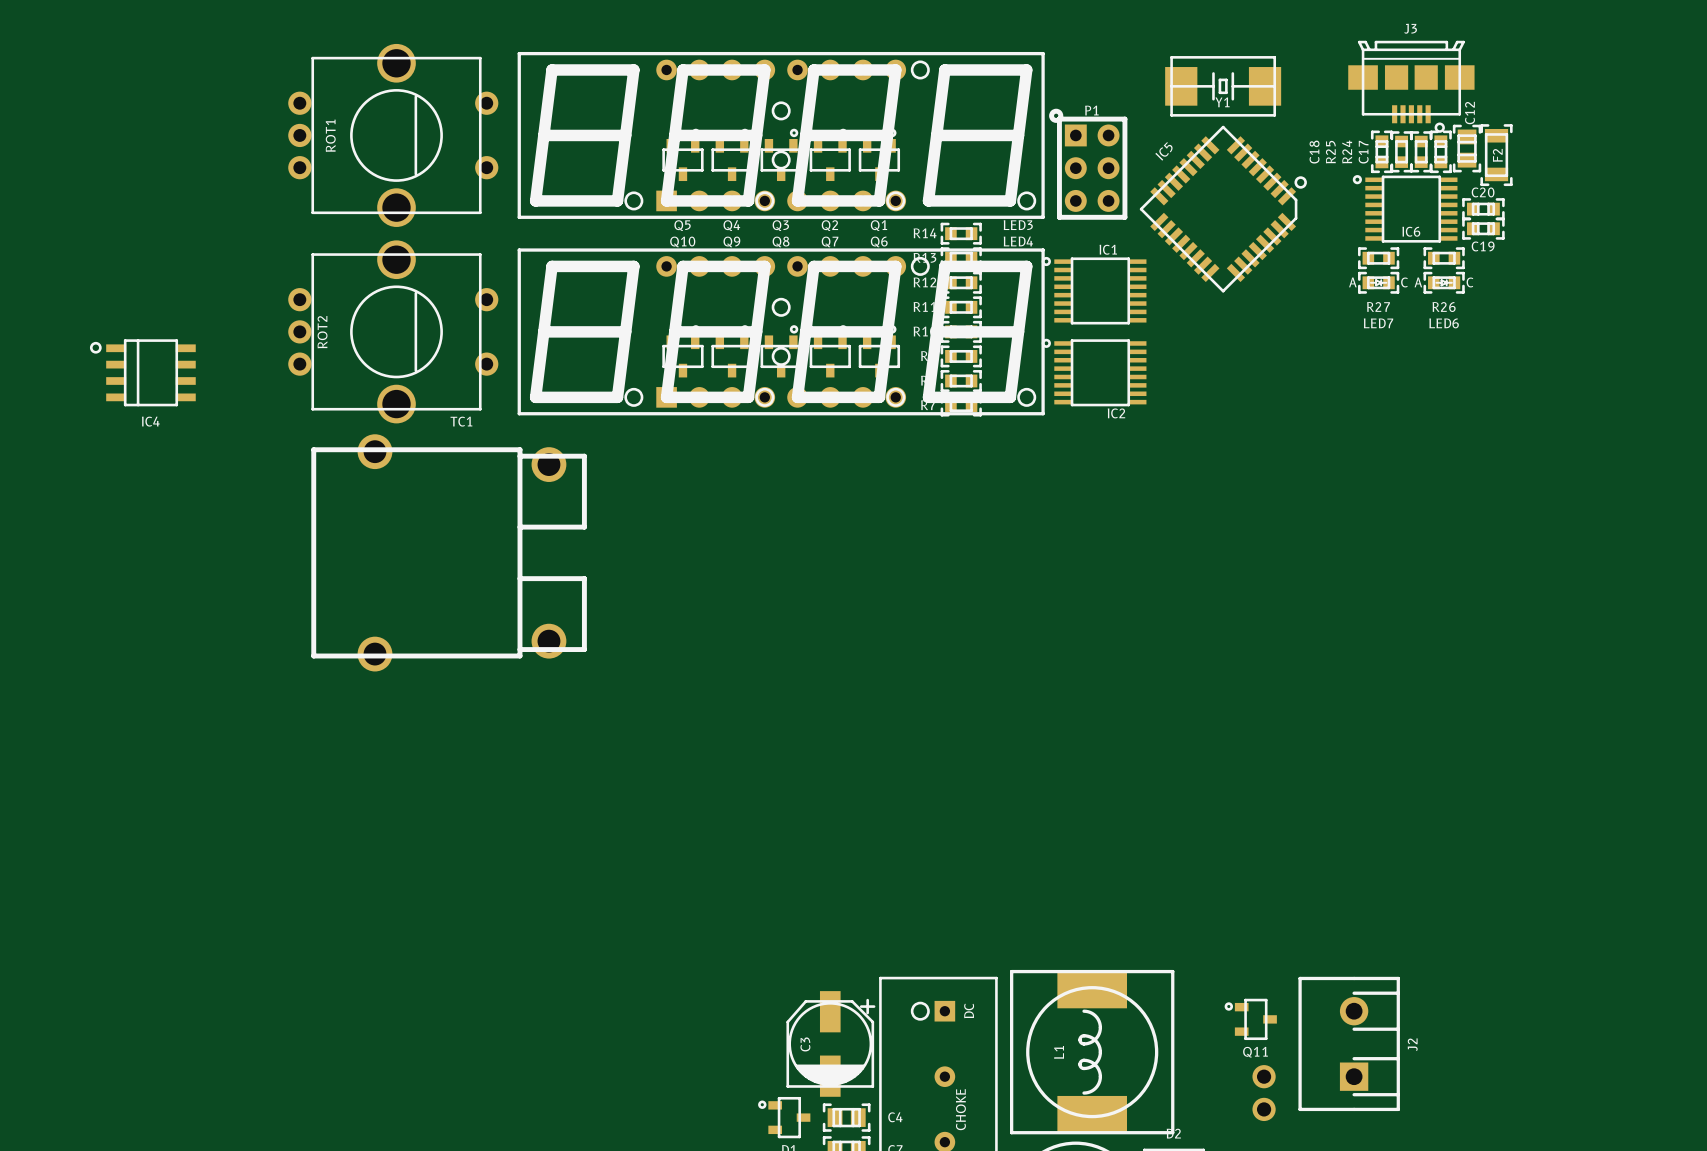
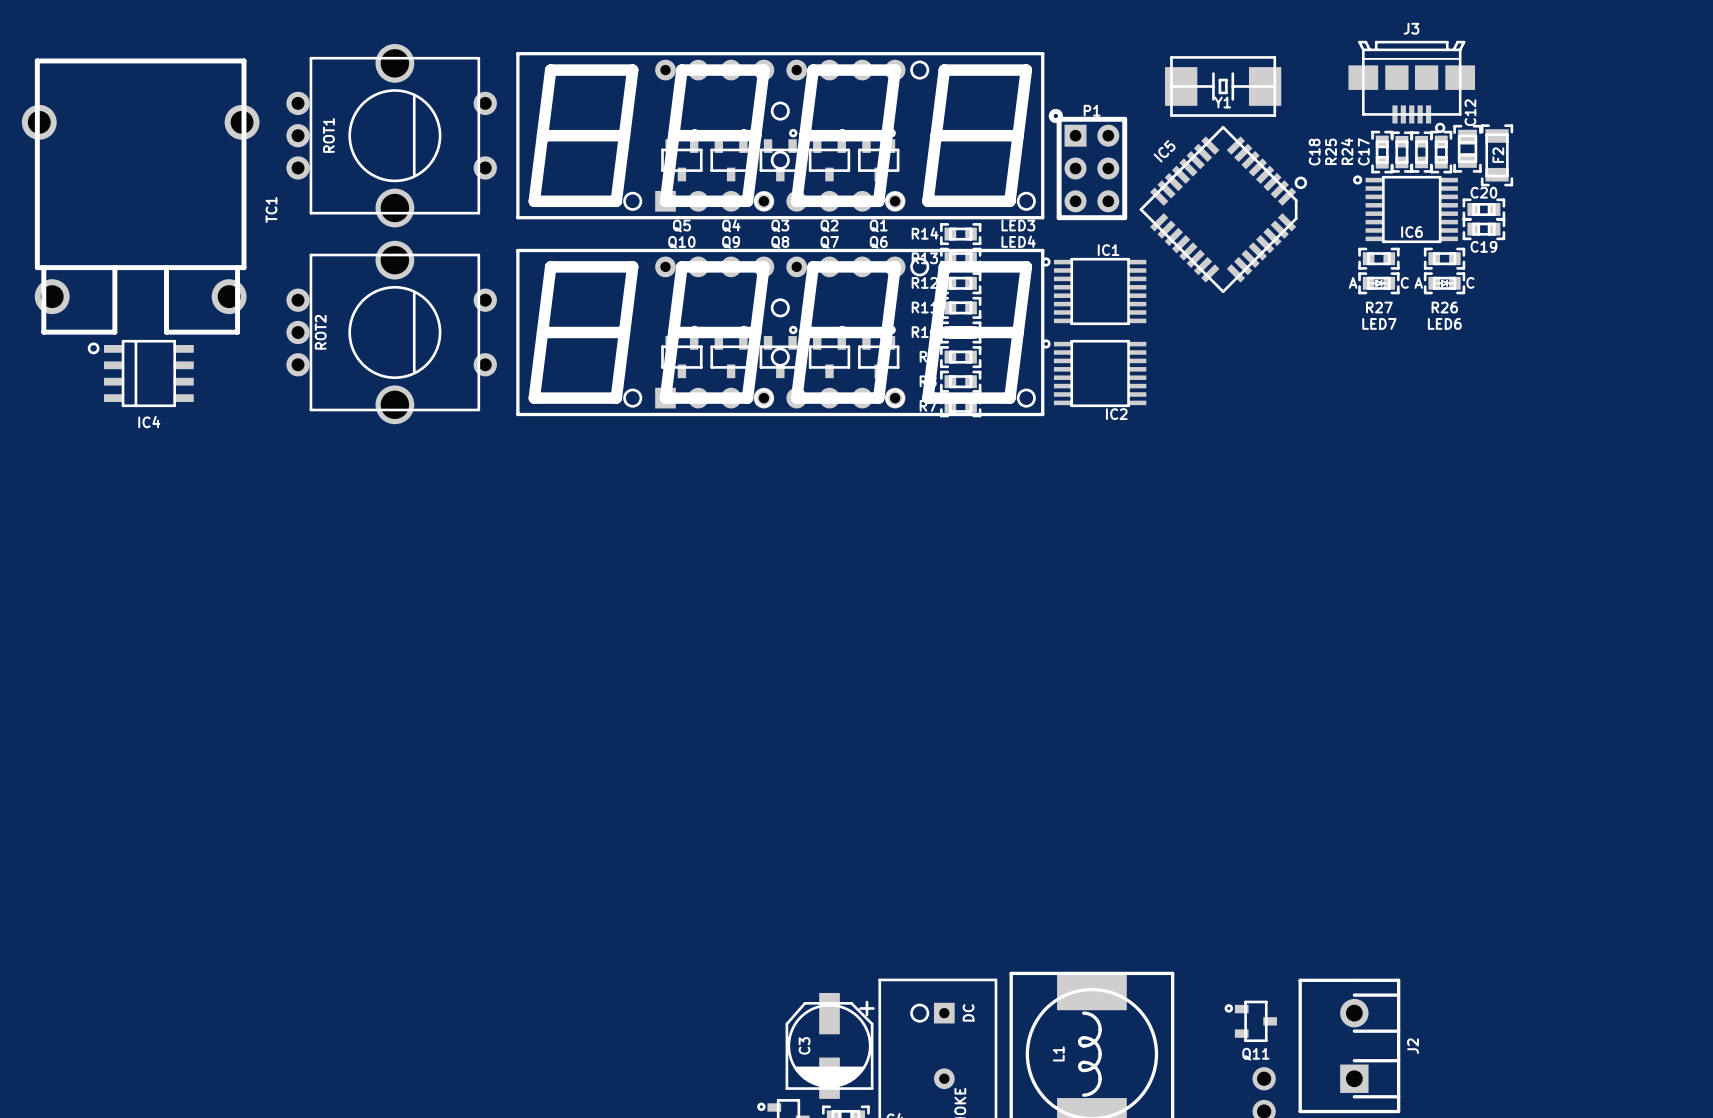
TC1 rotation: 0° (449, 552) -> 90° clockwise (140, 196)
TC1 position: (449, 552) -> (140, 196)

